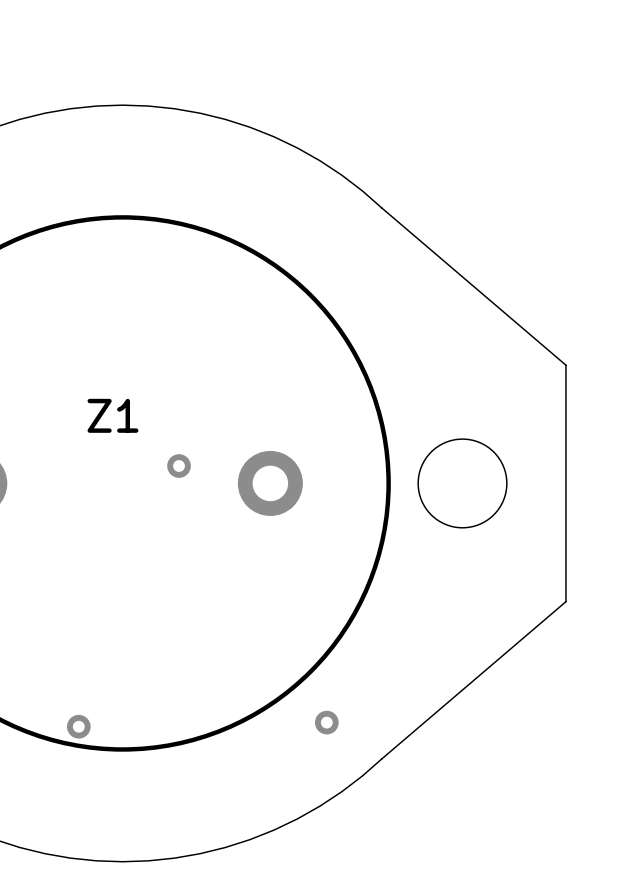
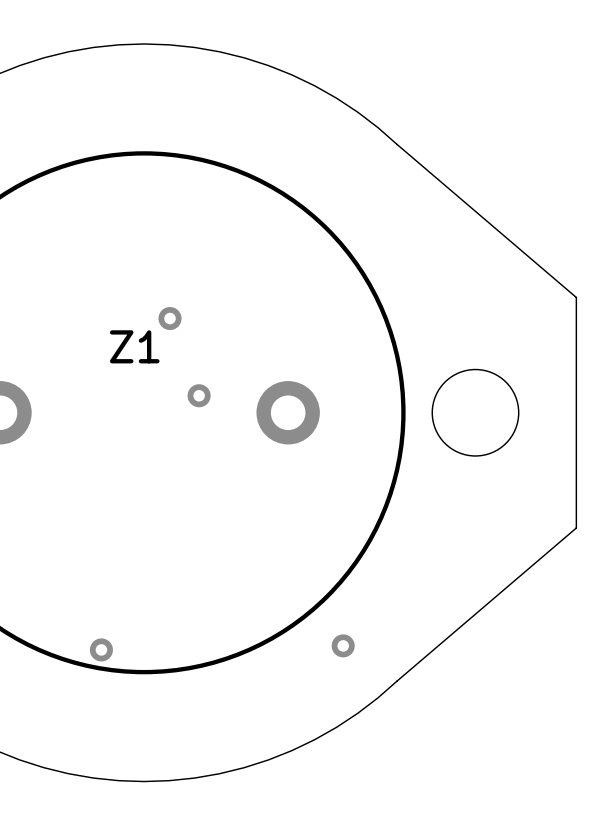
via: none -> (170, 318)

